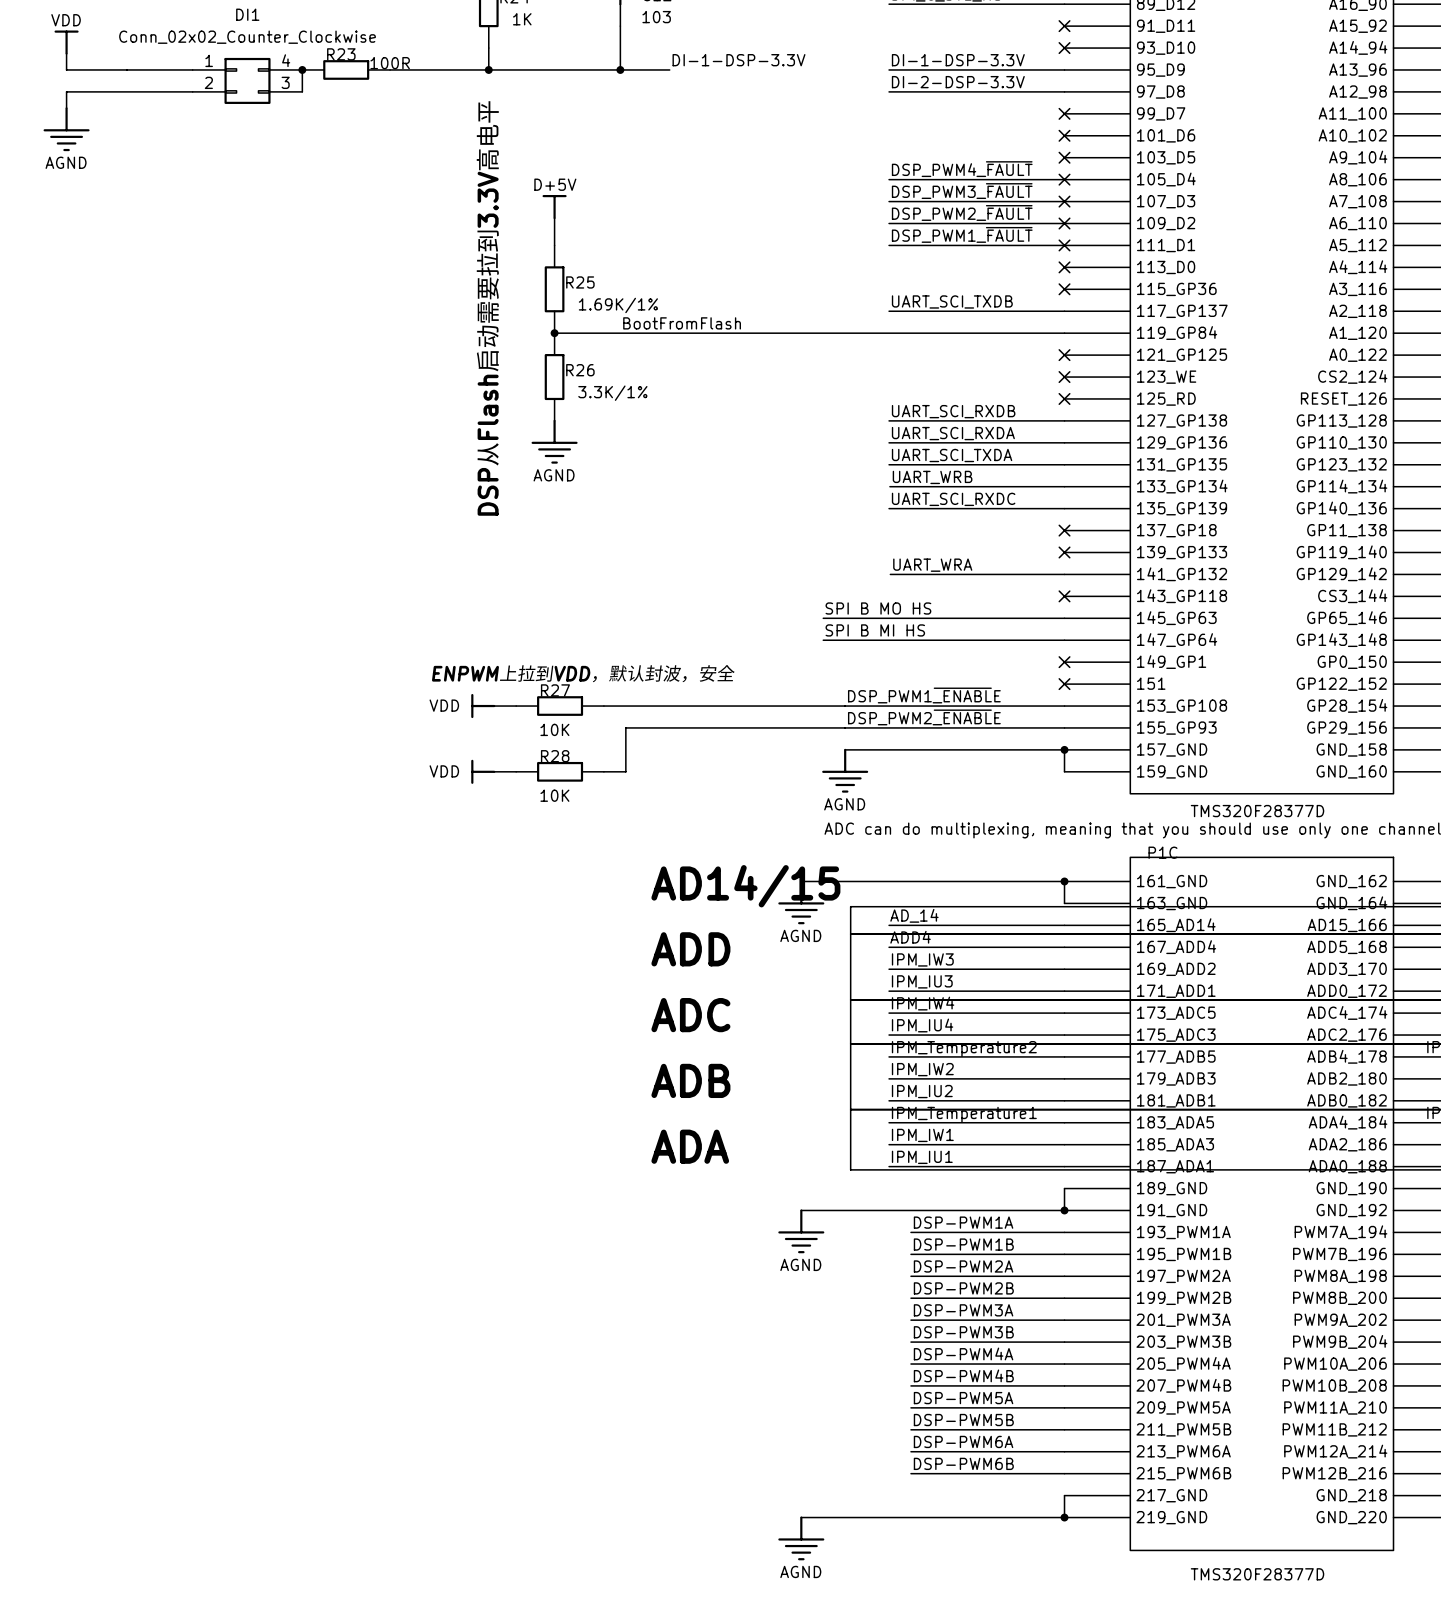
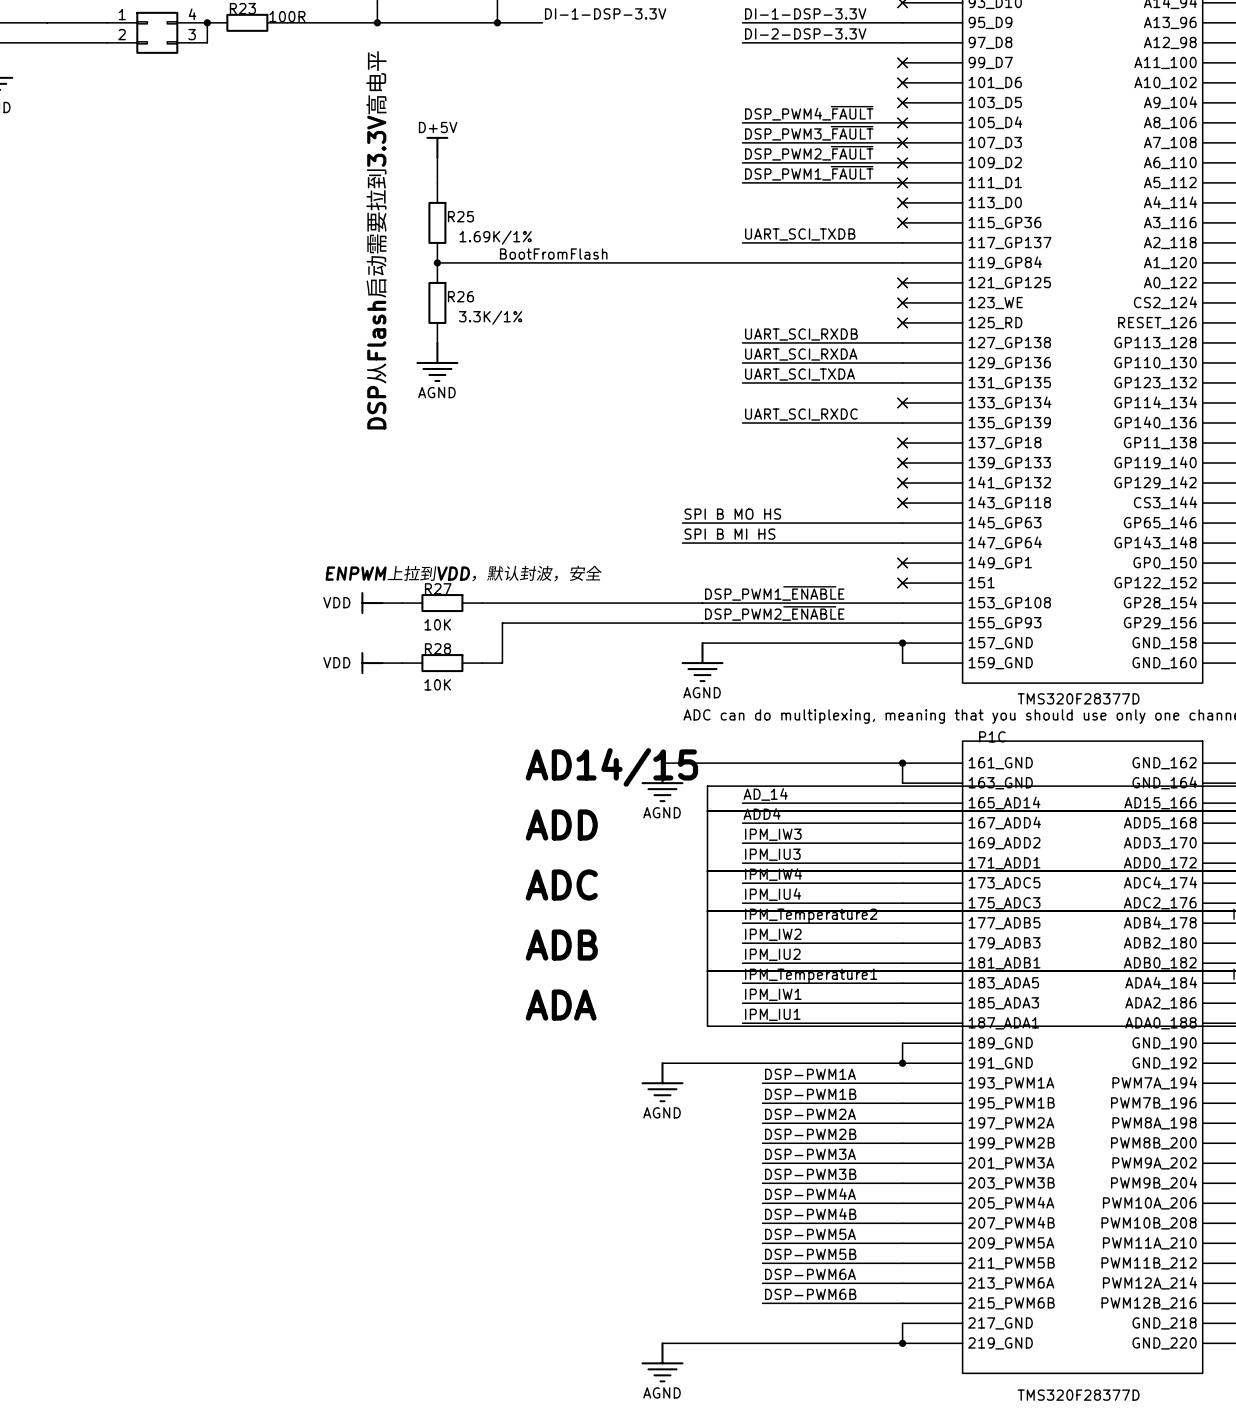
label: UART_WRB (932, 477) -> none
wire: (889, 486) (1064, 486) -> none
no-connect mark: none -> (902, 402)
label: UART_WRA (932, 565) -> none
wire: (890, 574) (1064, 574) -> none
no-connect mark: none -> (902, 483)

